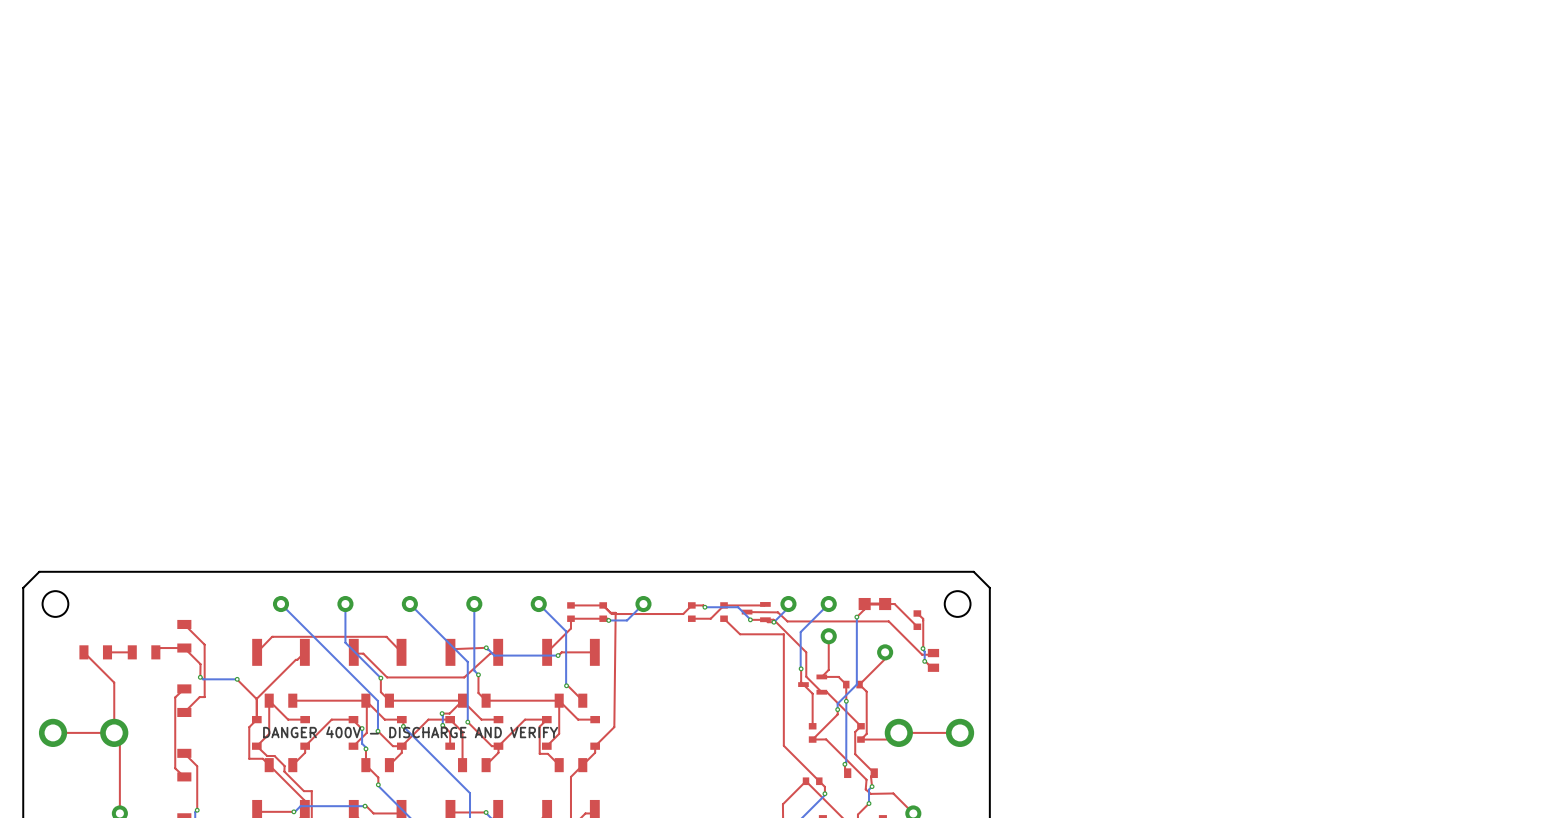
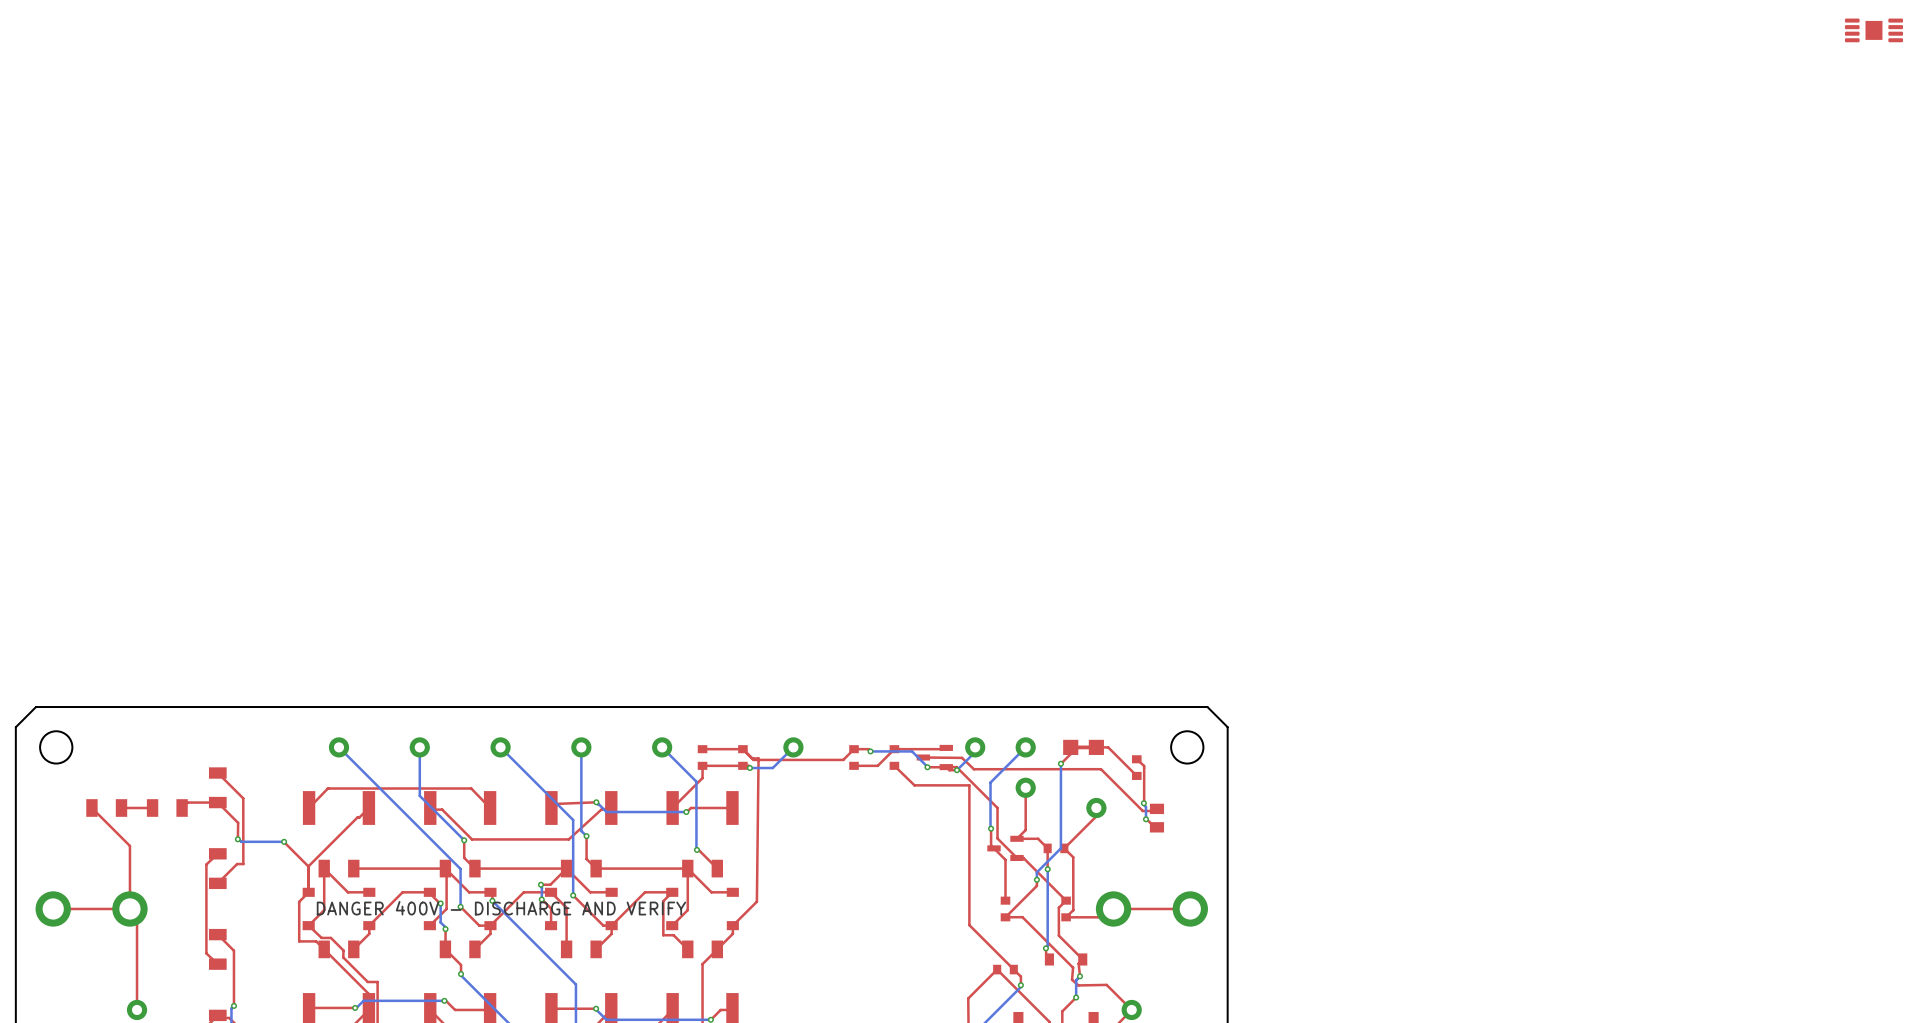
part: none -> (1873, 30)

